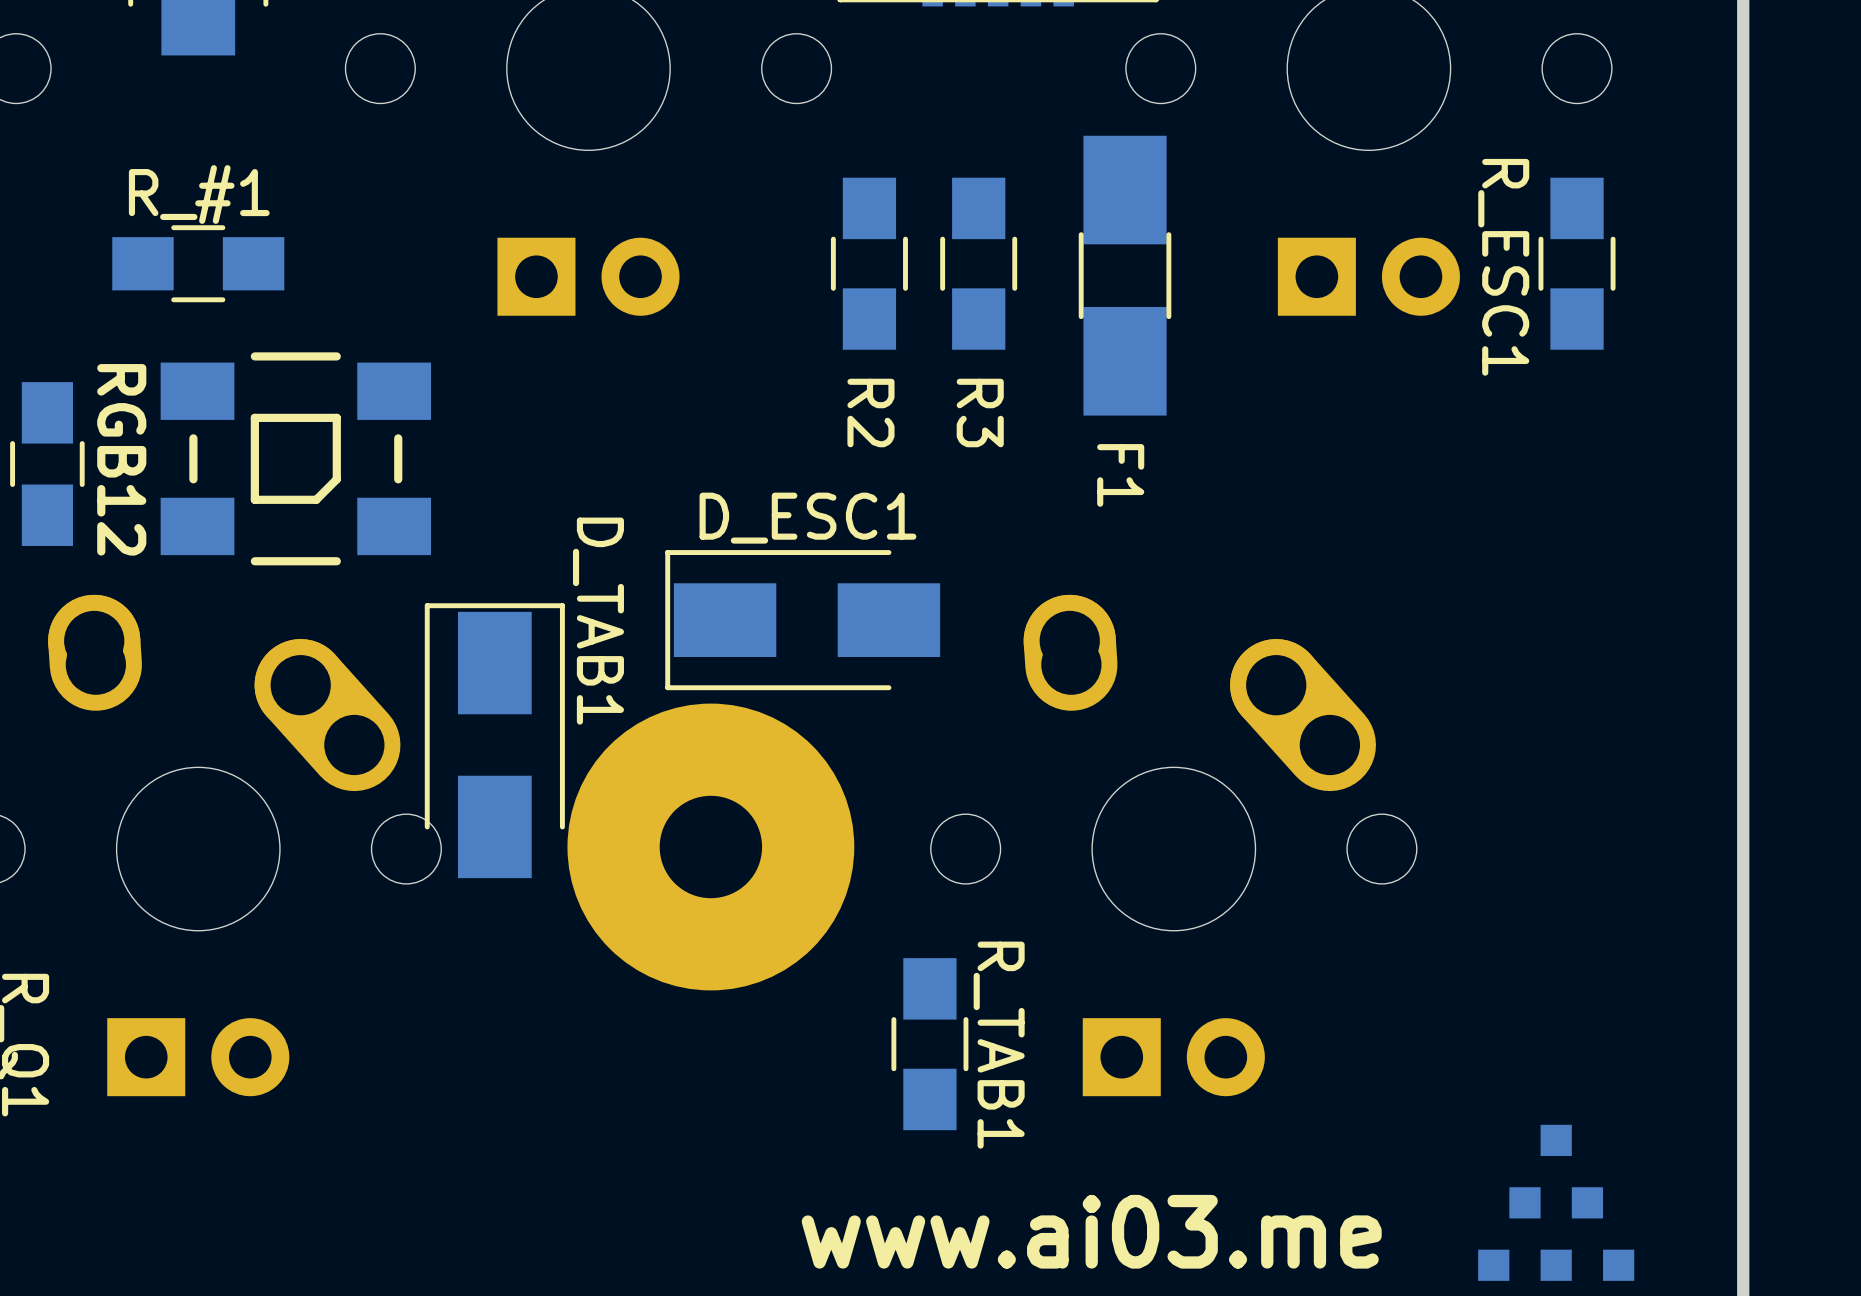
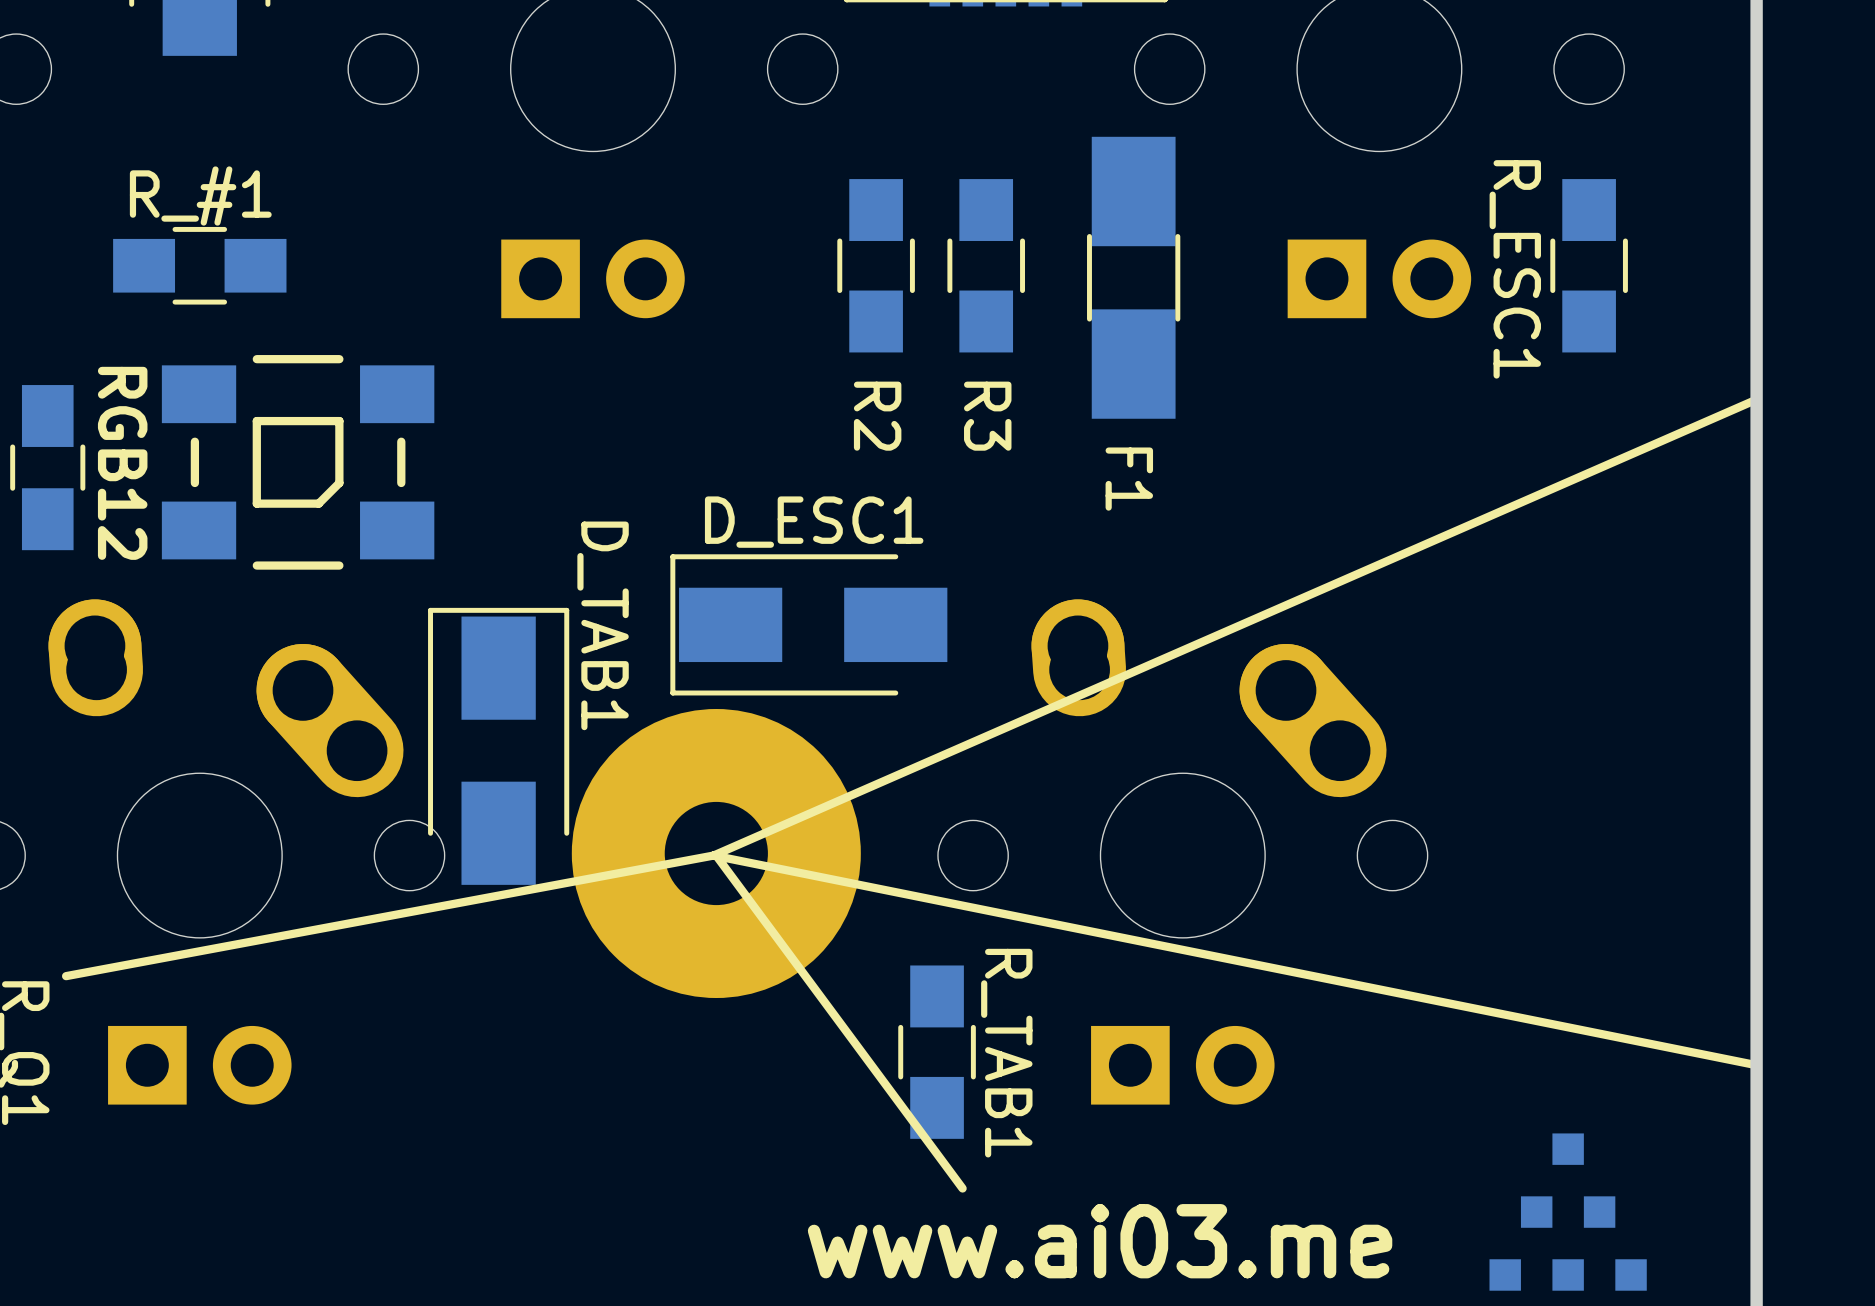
line: none -> (1756, 399) (713, 855)
line: none -> (713, 855) (66, 976)
line: none -> (713, 855) (1756, 1065)
line: none -> (716, 855) (962, 1188)

